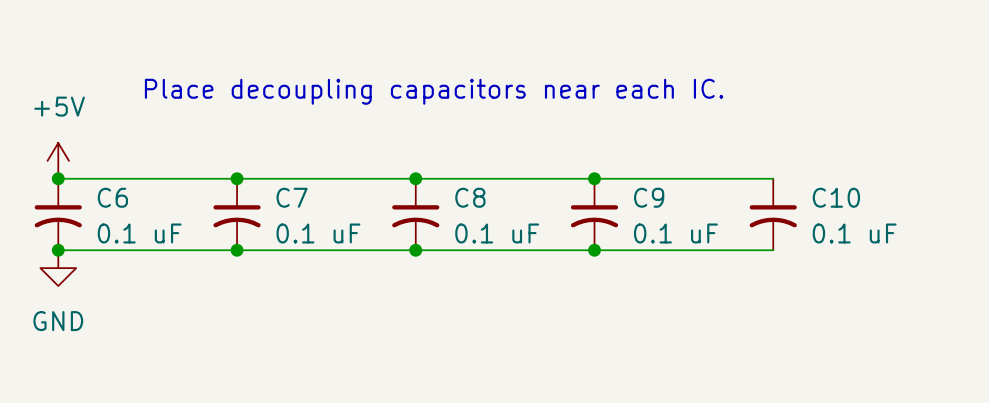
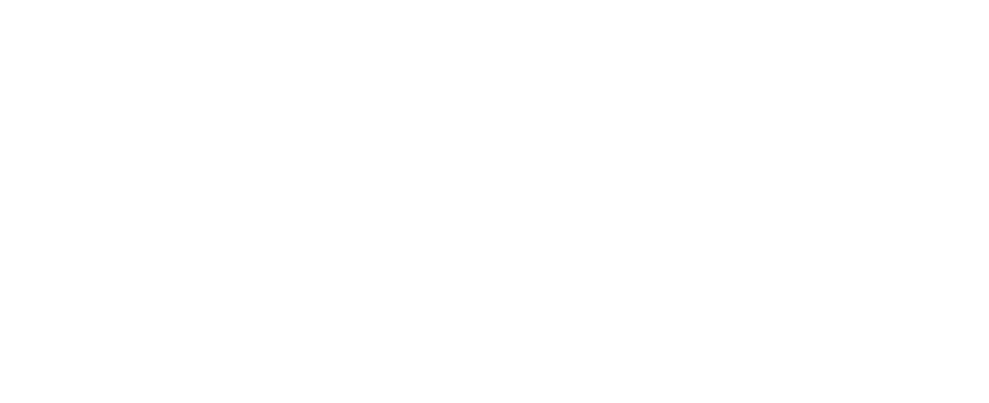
text: Place decoupling capacitors near each IC. (434, 91) -> none
power symbol: +5V (58, 160) -> none
wire: (58, 178) (773, 178) -> none
junction: (58, 178) -> none
junction: (237, 178) -> none
junction: (415, 178) -> none
junction: (594, 178) -> none
C6: 0.1 uF (58, 214) -> none
C7: 0.1 uF (237, 214) -> none
C8: 0.1 uF (415, 214) -> none
C9: 0.1 uF (594, 214) -> none
C10: 0.1 uF (773, 214) -> none
wire: (58, 250) (773, 250) -> none
junction: (58, 250) -> none
junction: (237, 250) -> none
junction: (415, 250) -> none
junction: (594, 250) -> none
power symbol: GND (58, 268) -> none

